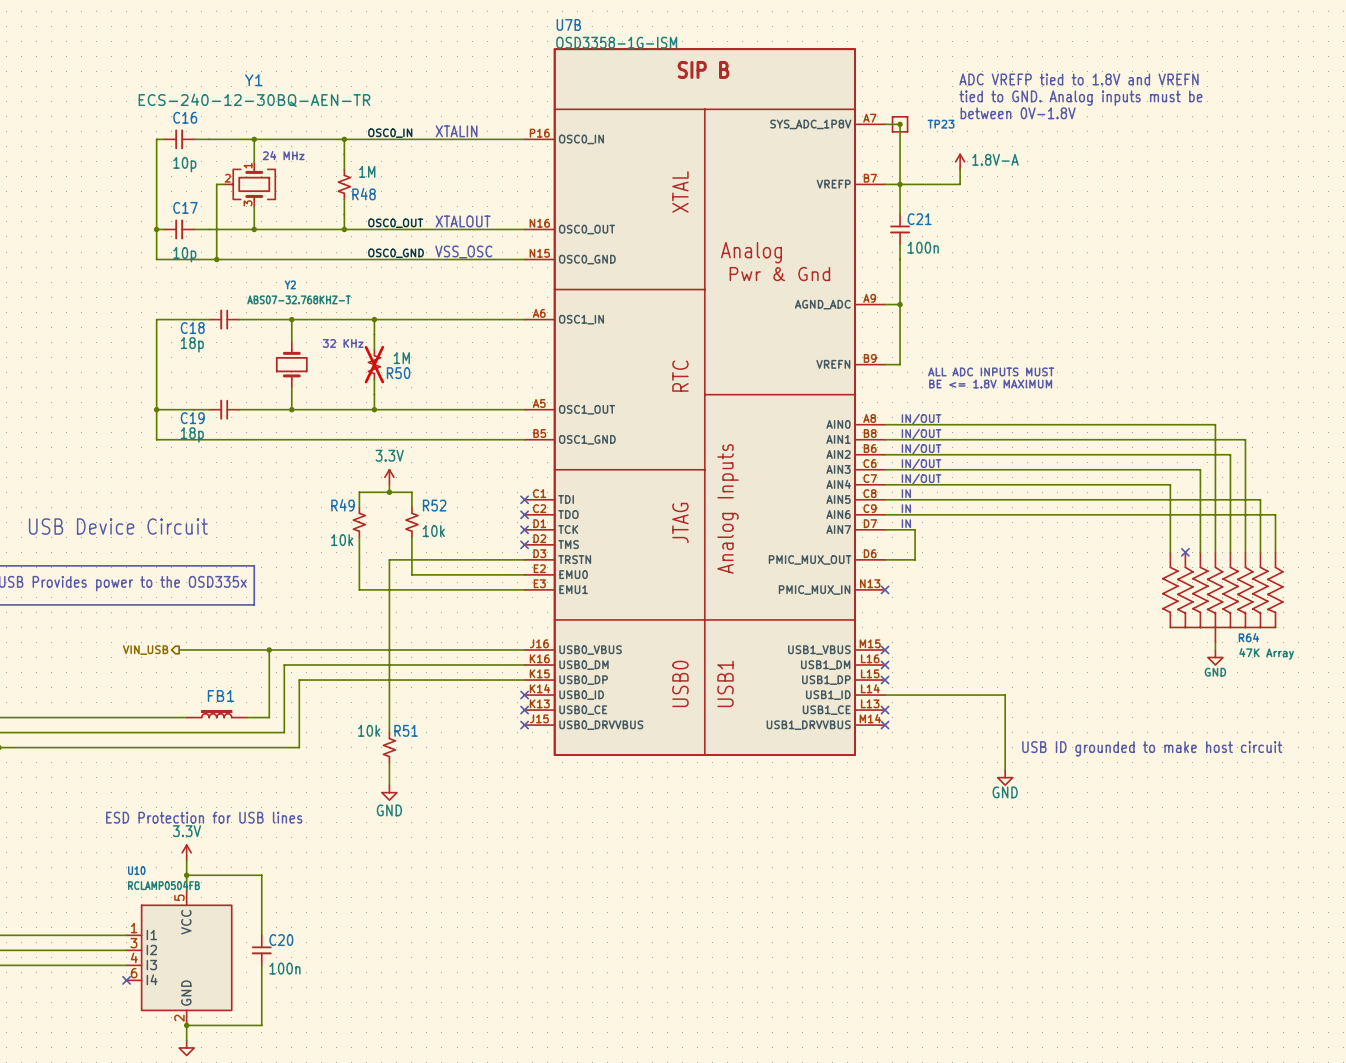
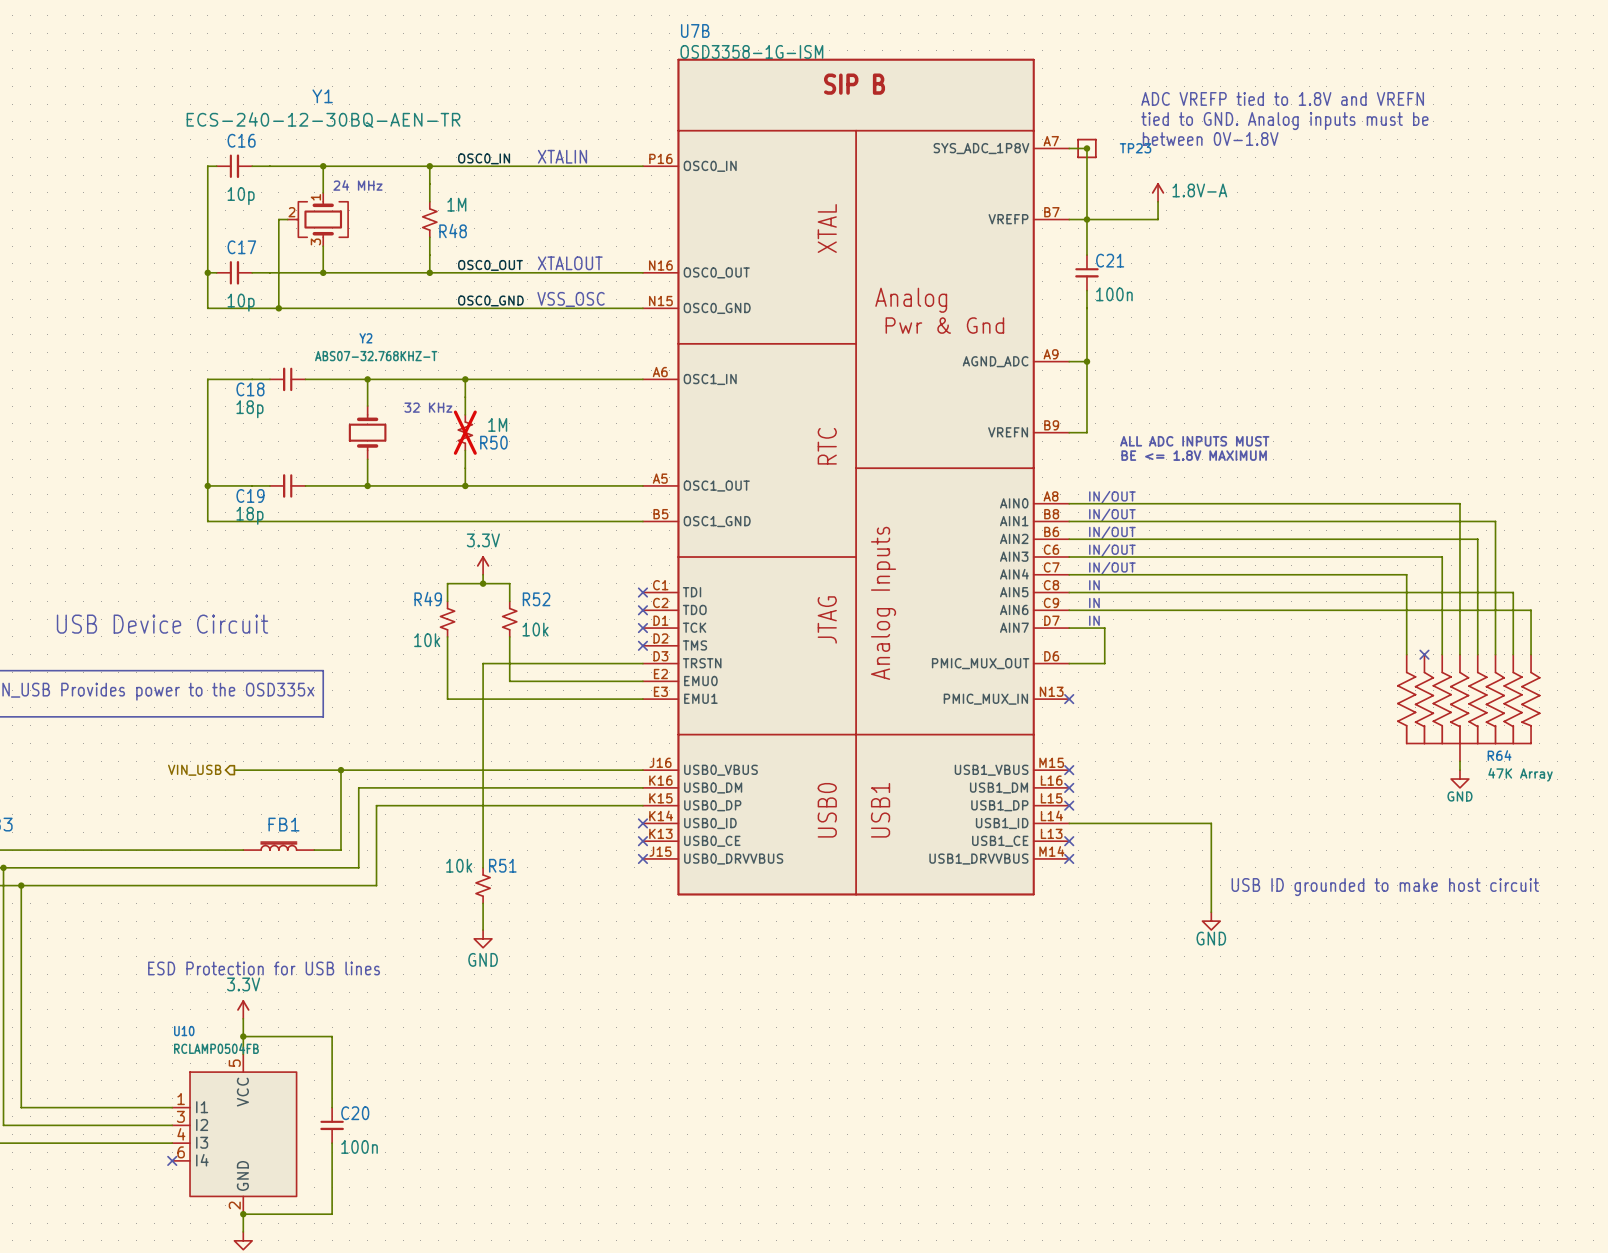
text position: ADC VREFP tied to 1.8V and VREFN (1078, 79) -> ADC VREFP tied to 1.8V and VREFN (1282, 98)
text position: tied to GND. Analog inputs must be (1080, 98) -> tied to GND. Analog inputs must be (1284, 121)
text position: between 0V-1.8V (1018, 113) -> between 0V-1.8V (1210, 138)

